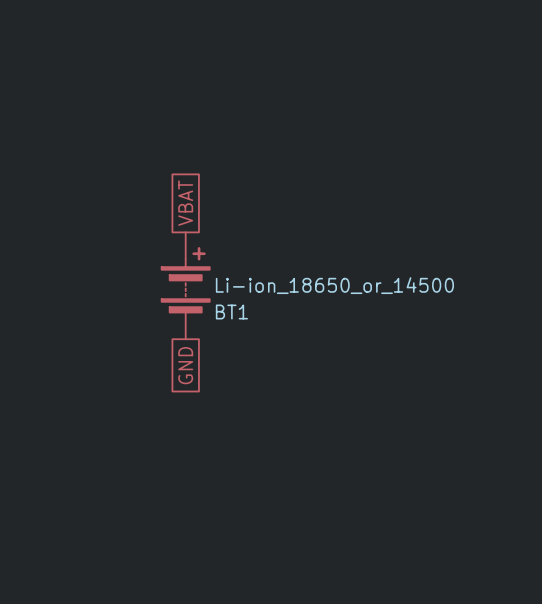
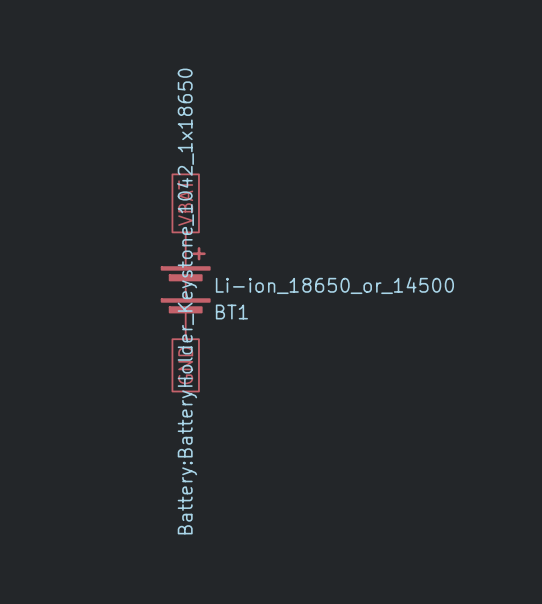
BT1 text: none -> Battery:BatteryHolder_Keystone_1042_1x18650 (187, 301)

